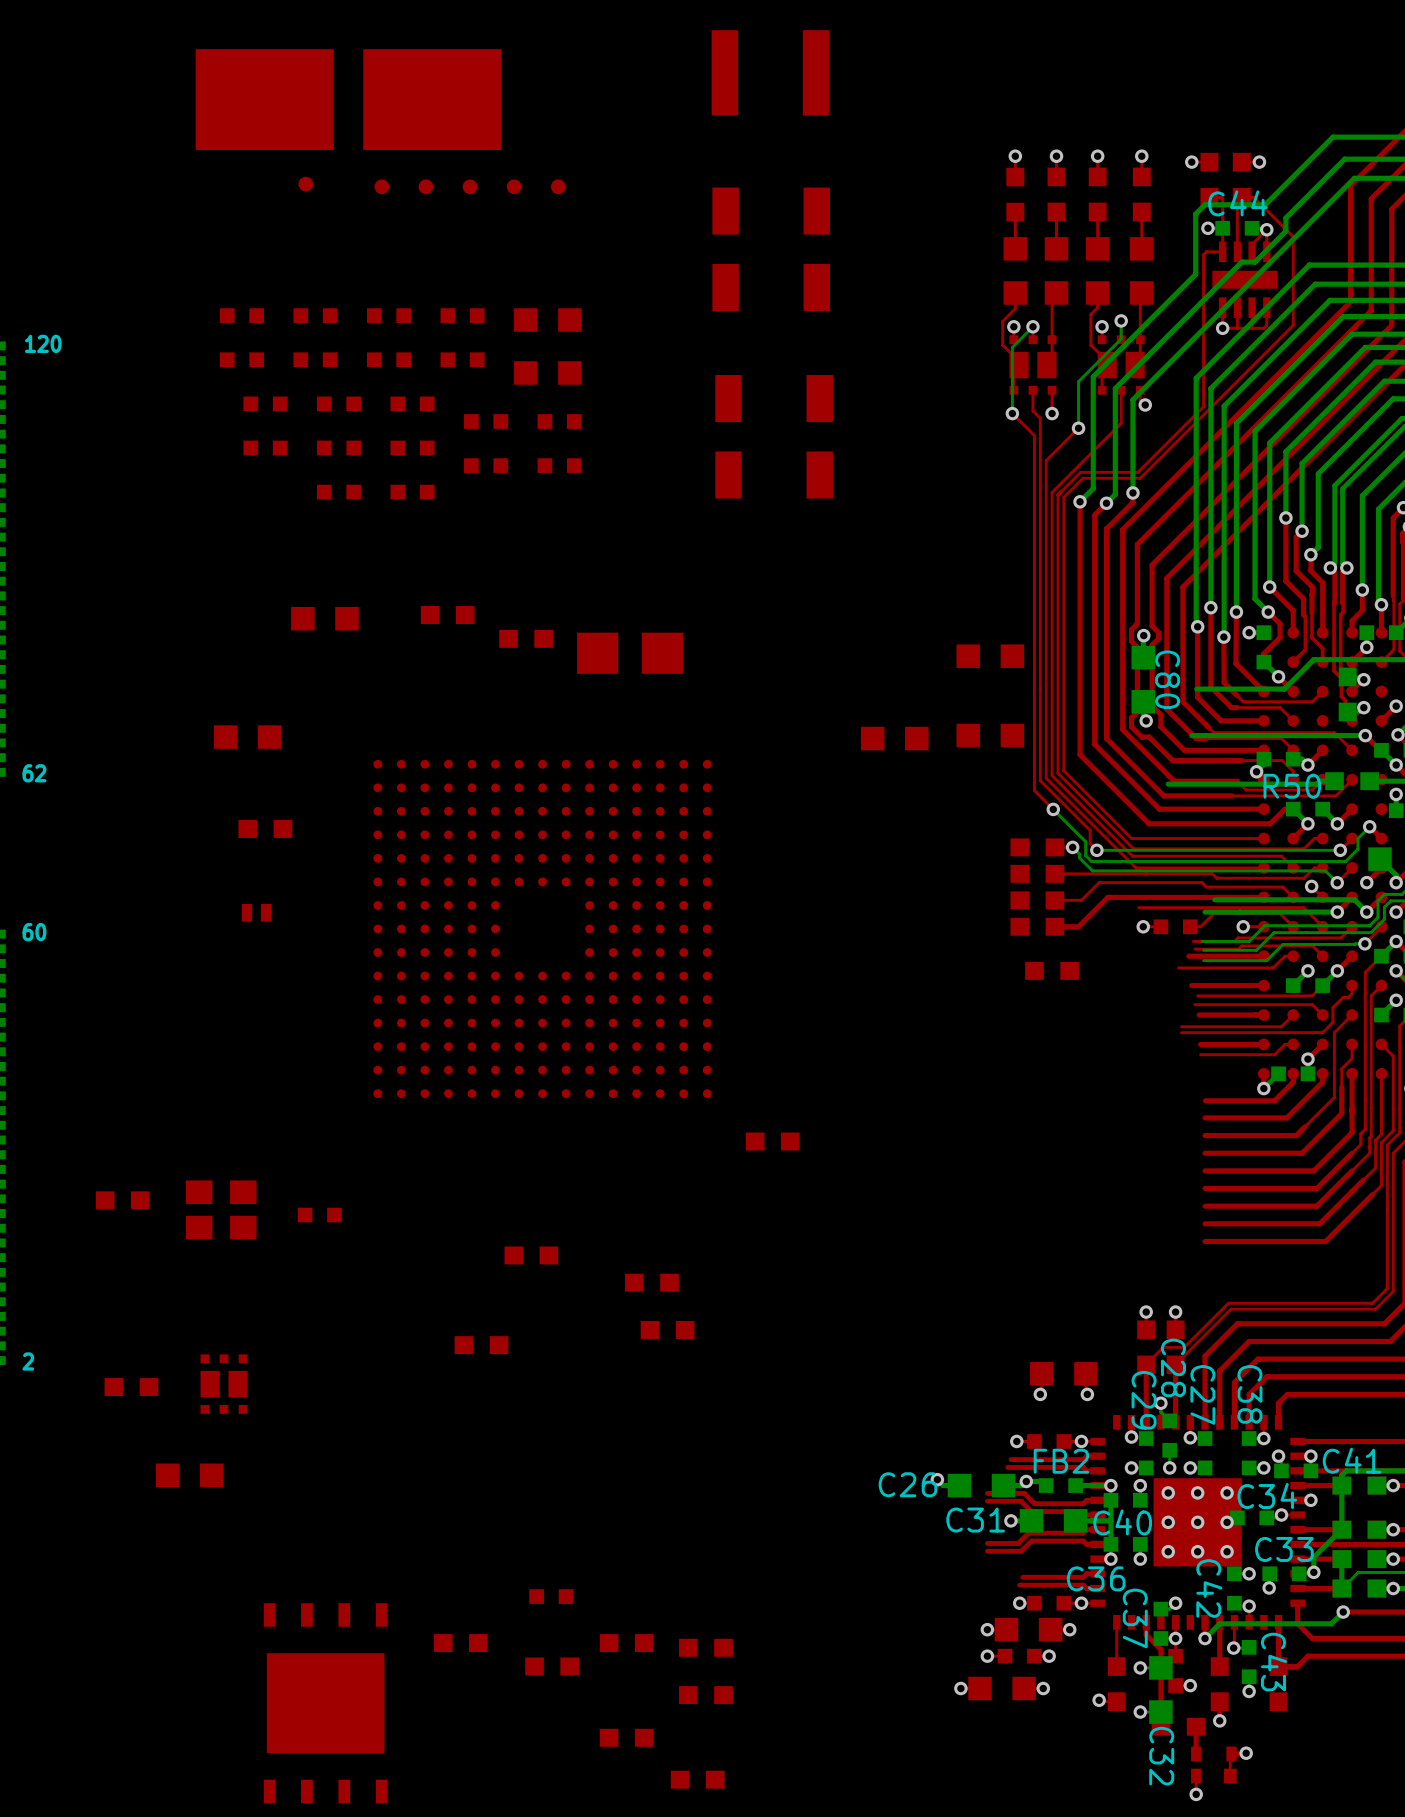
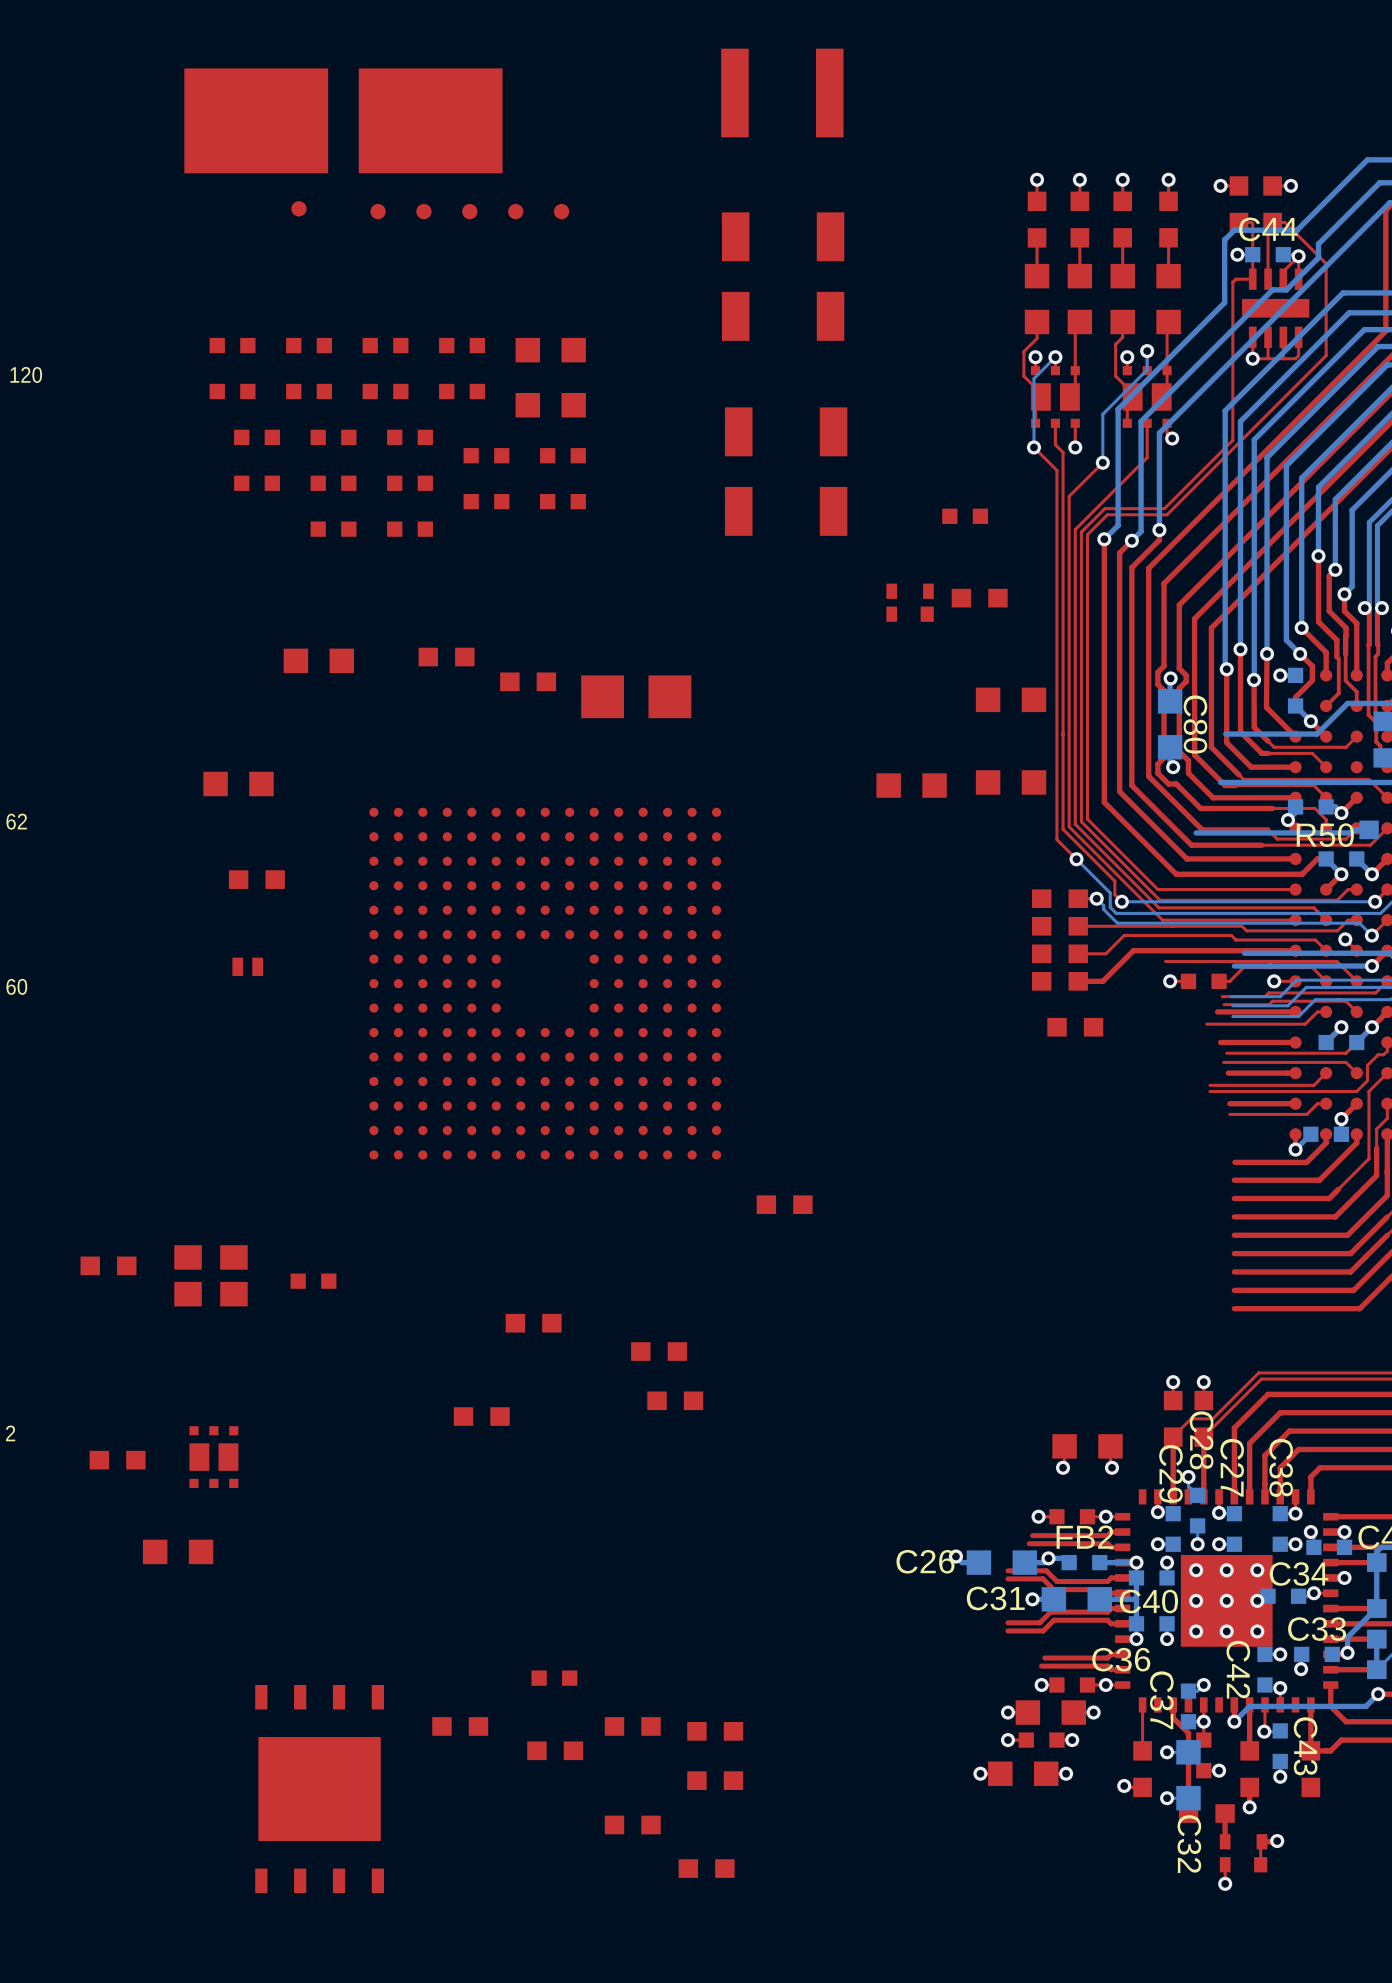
part: none -> (965, 516)
part: none -> (979, 598)
part: none -> (910, 602)

